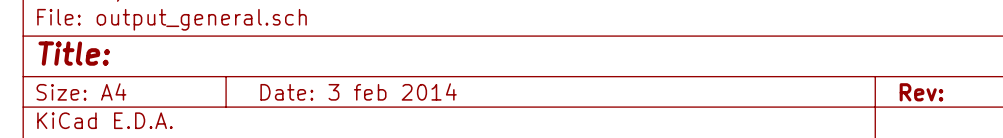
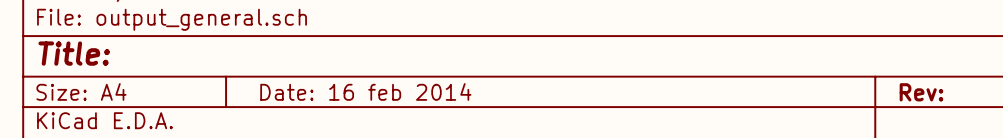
title block: Date: 3 feb 2014 (358, 91) -> Date: 16 feb 2014 (365, 91)

